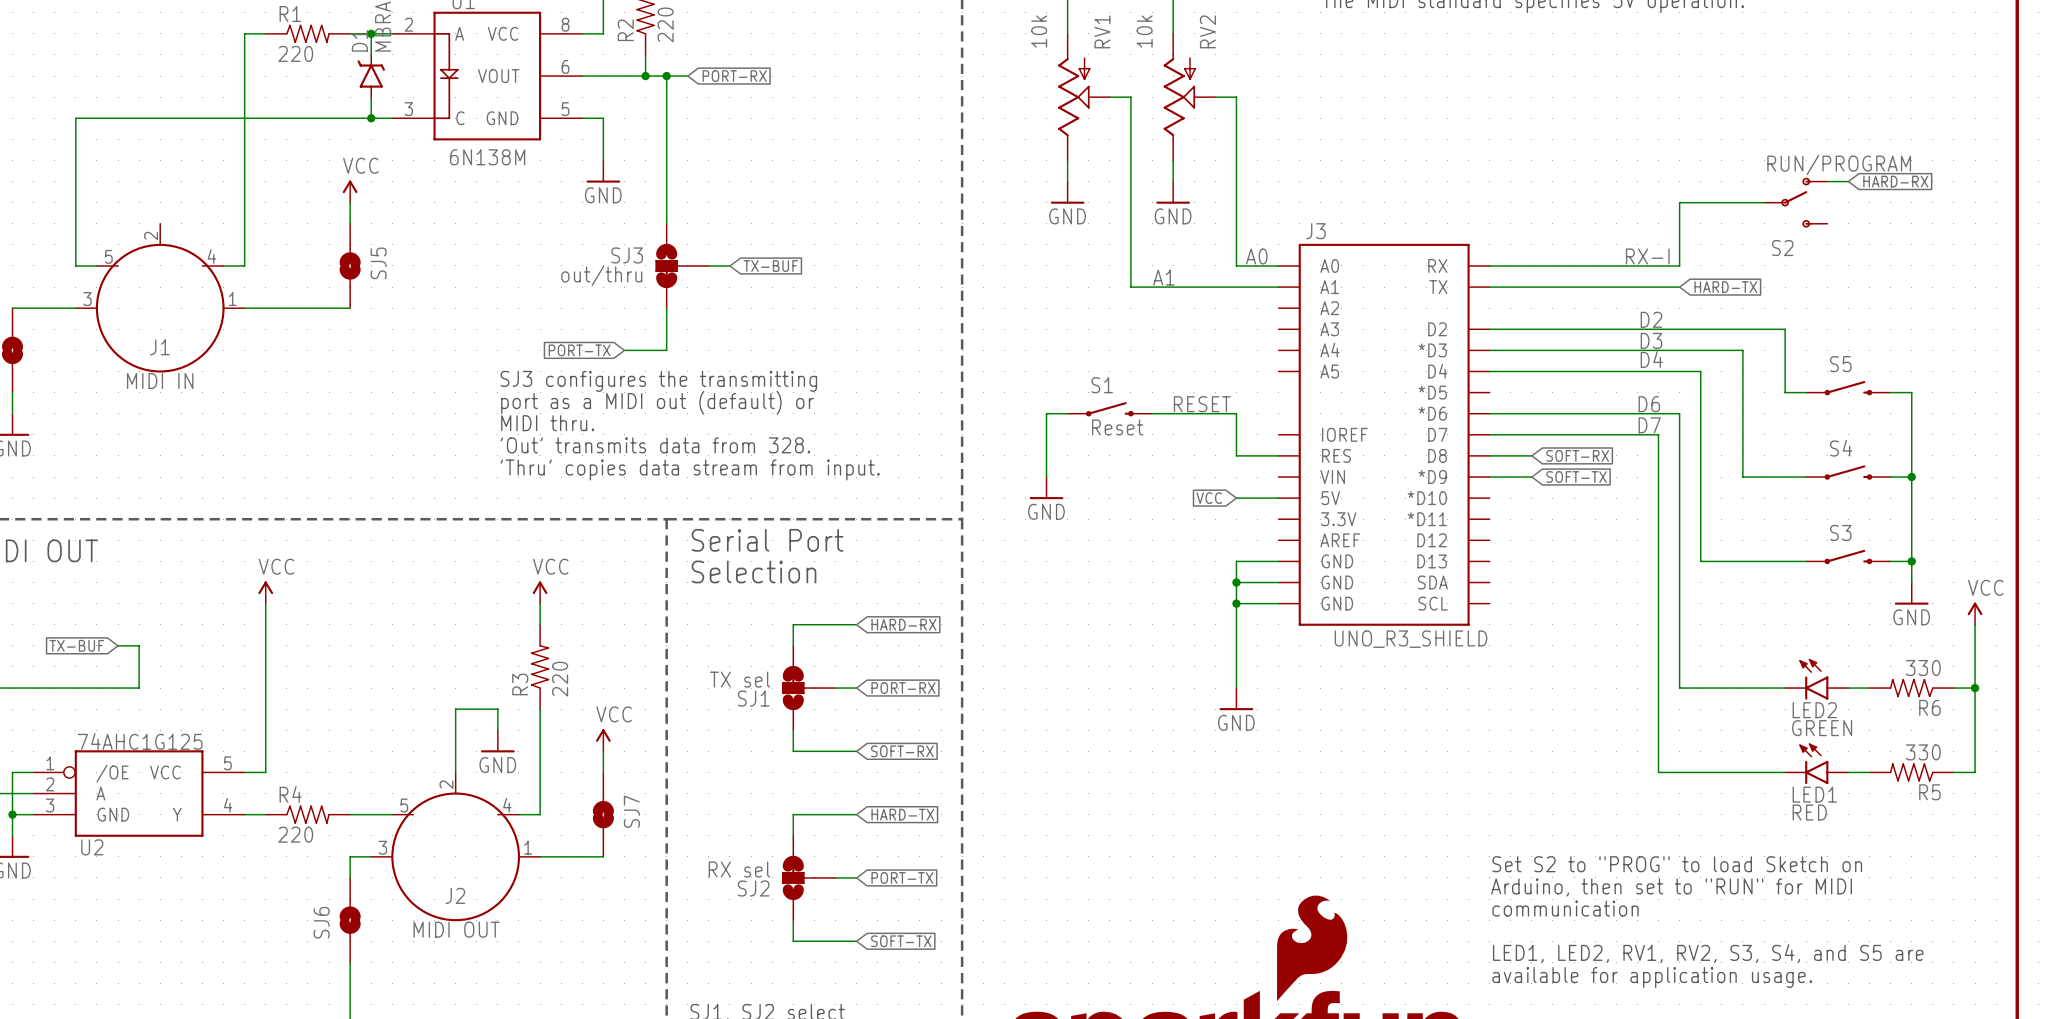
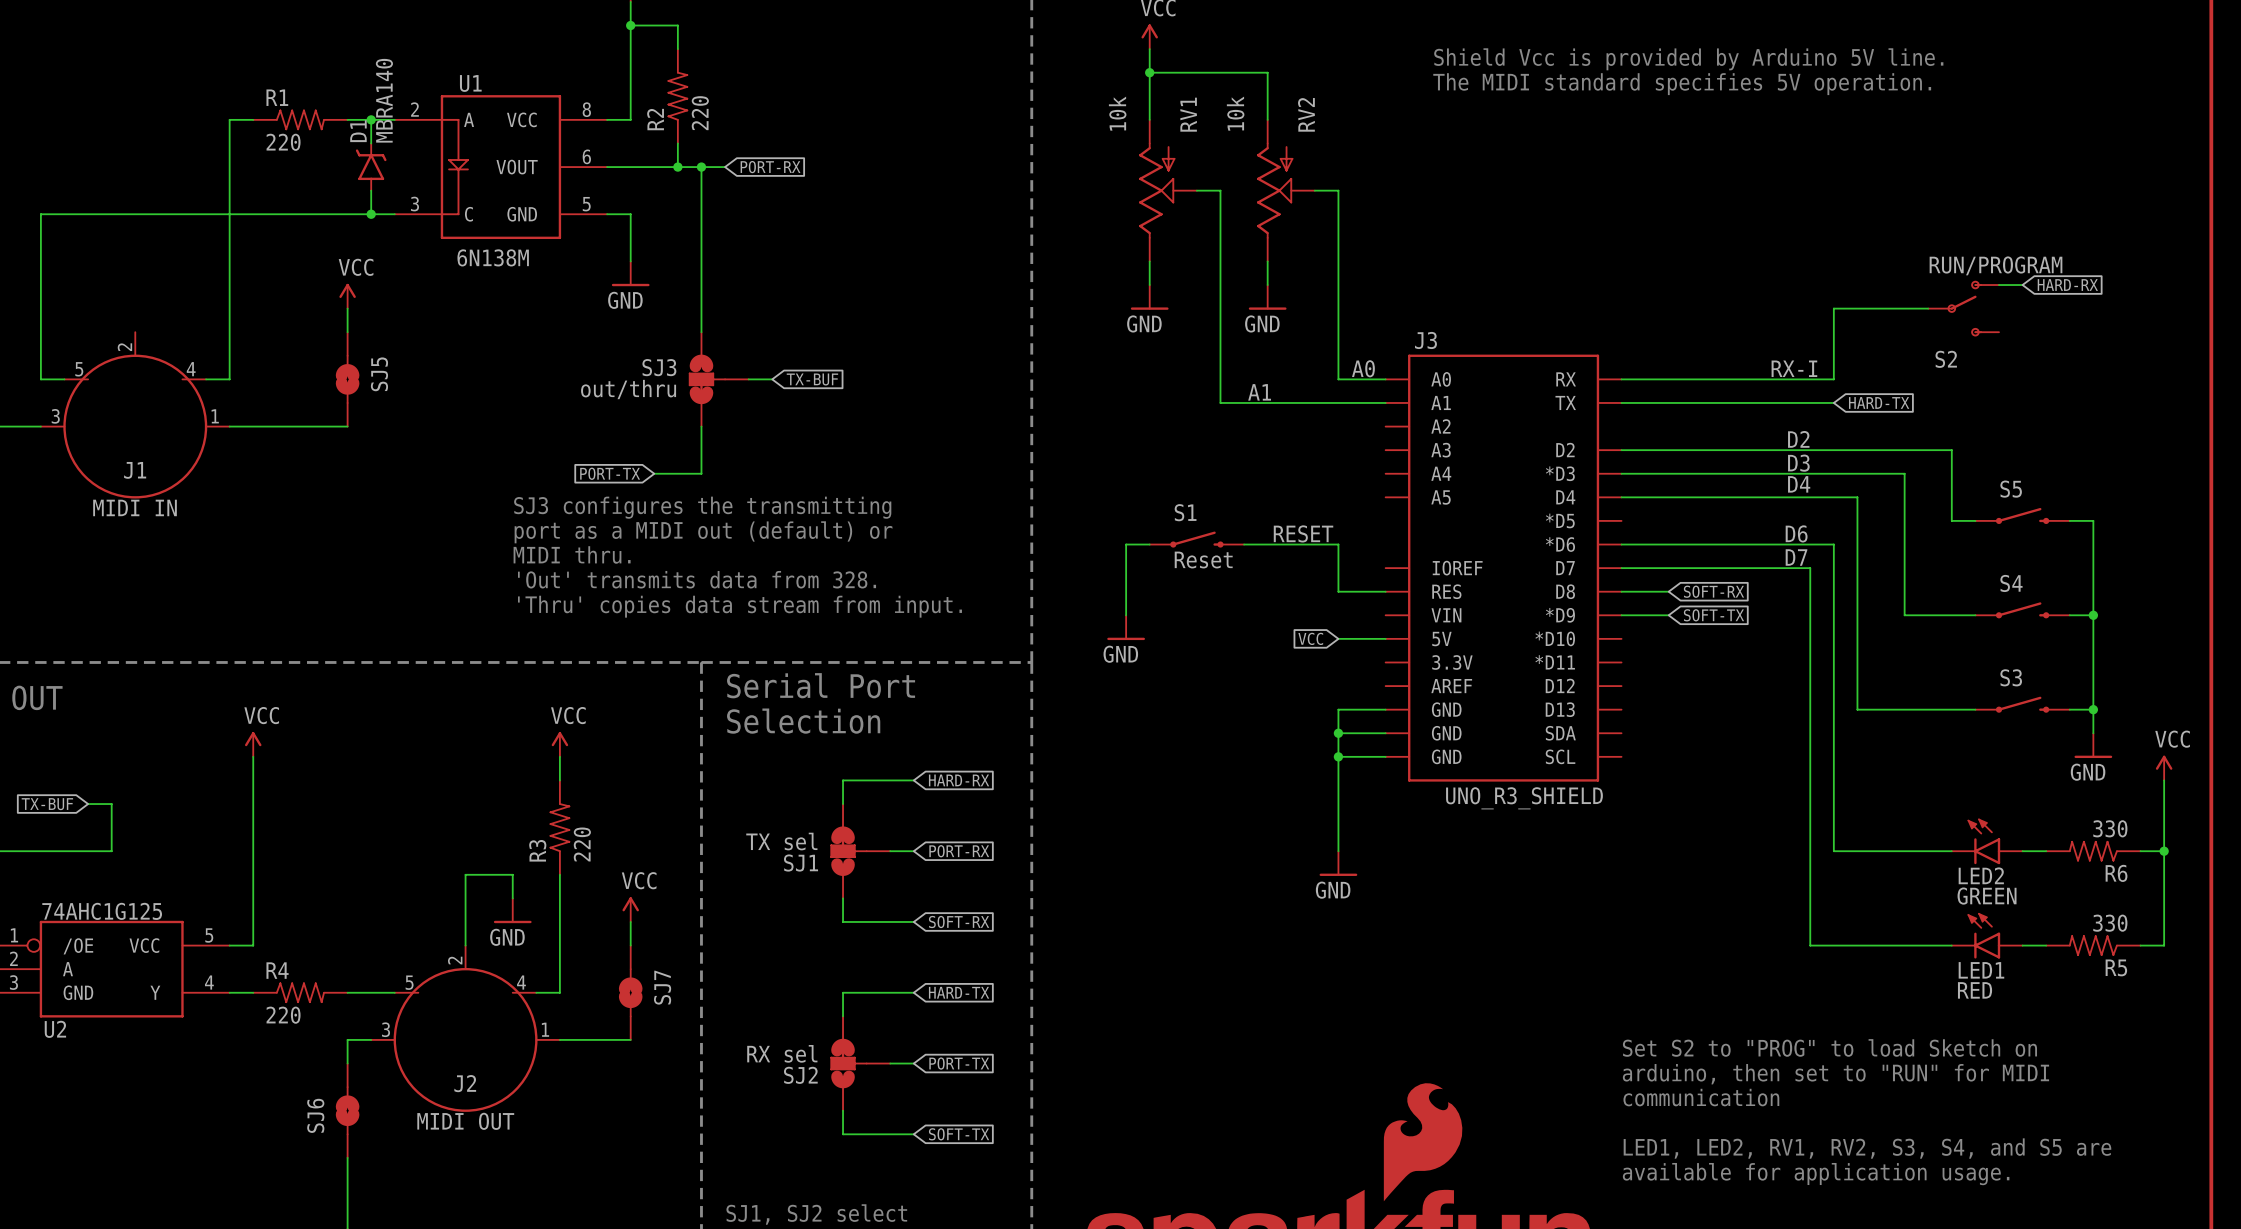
text: Arduino, then set to "RUN" for MIDI (1671, 887) -> arduino, then set to "RUN" for MIDI (1835, 1074)

